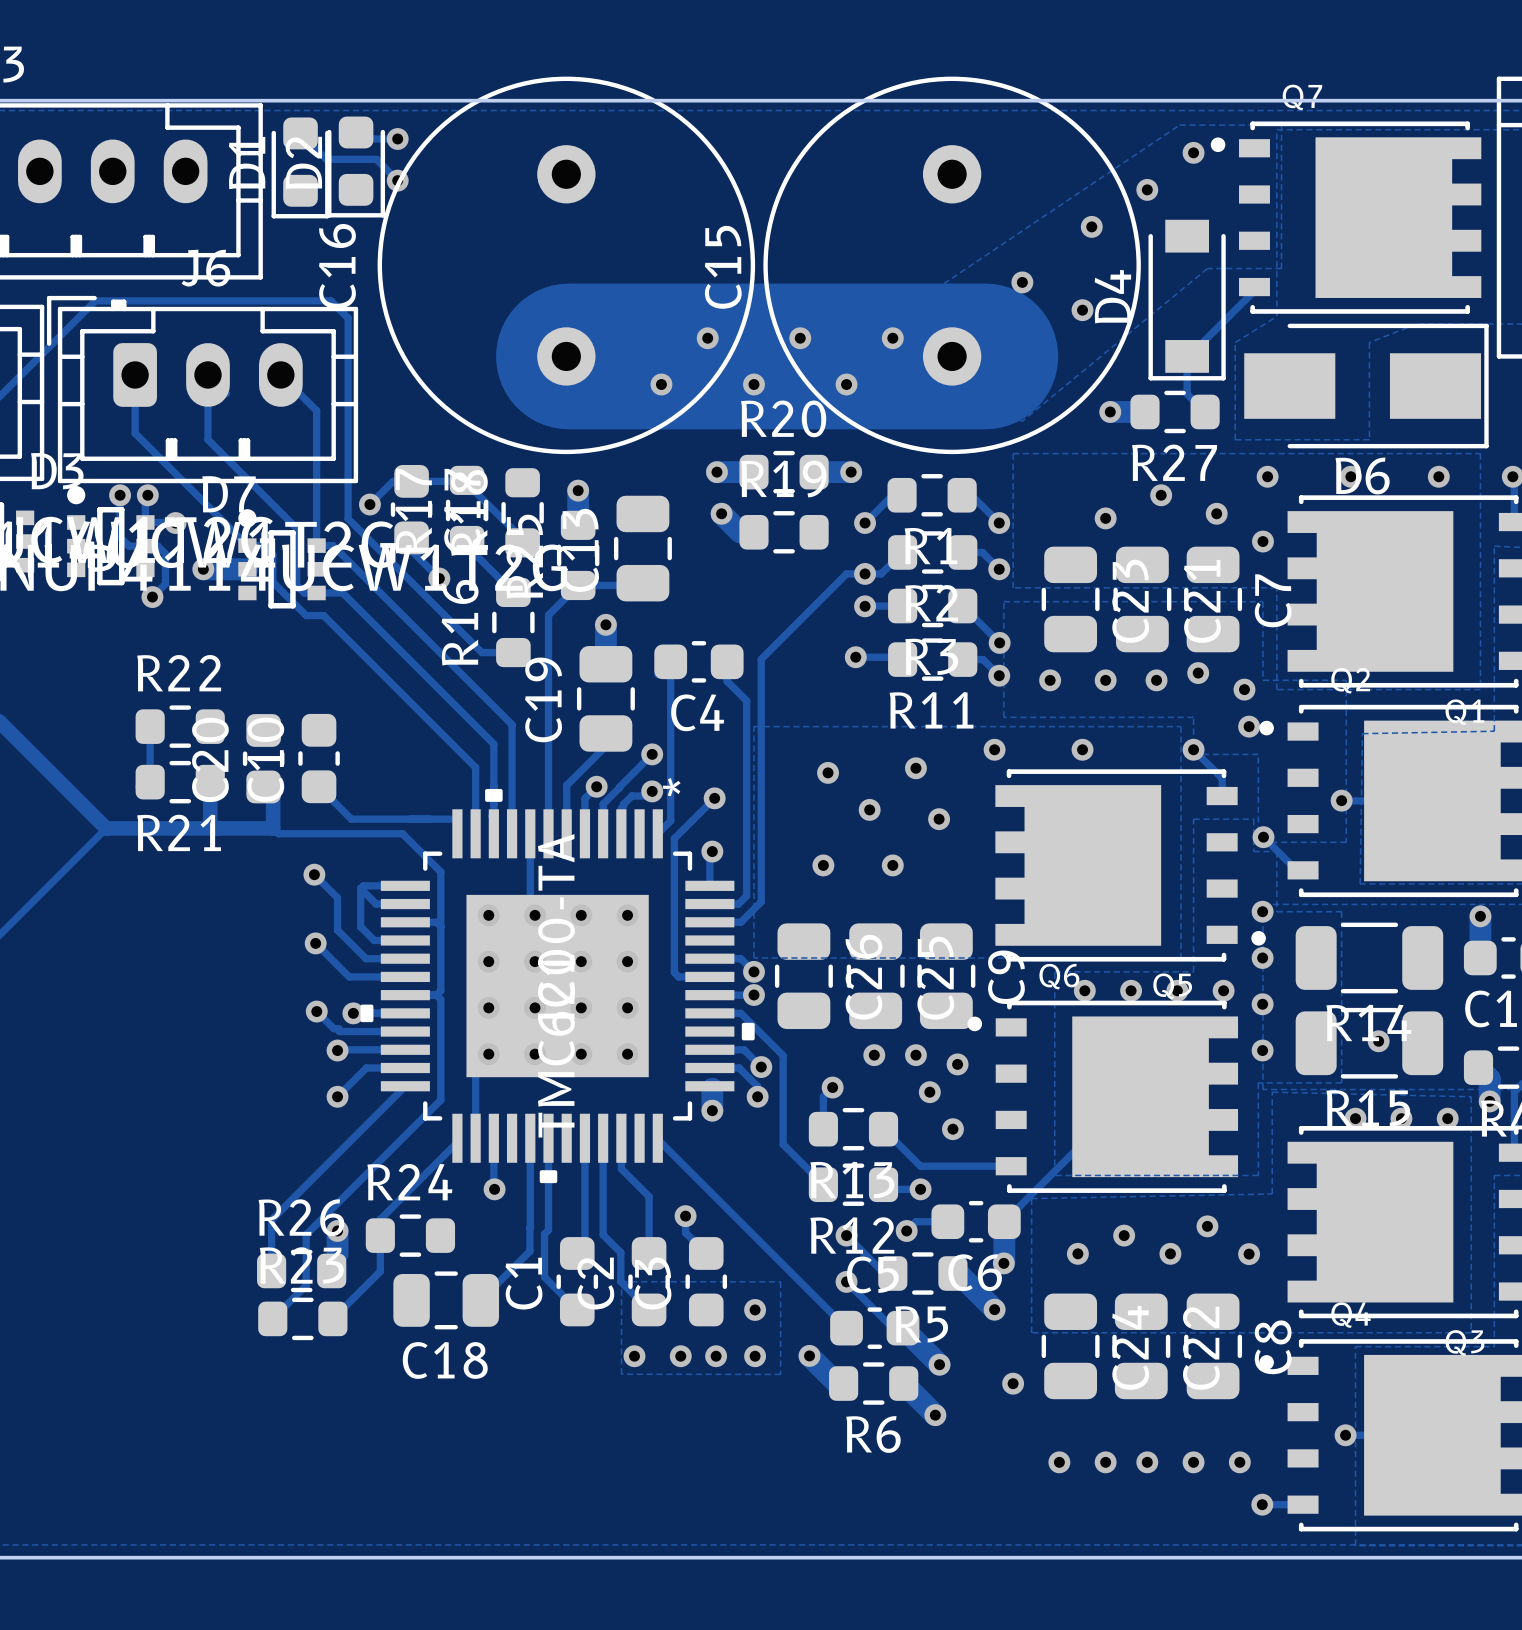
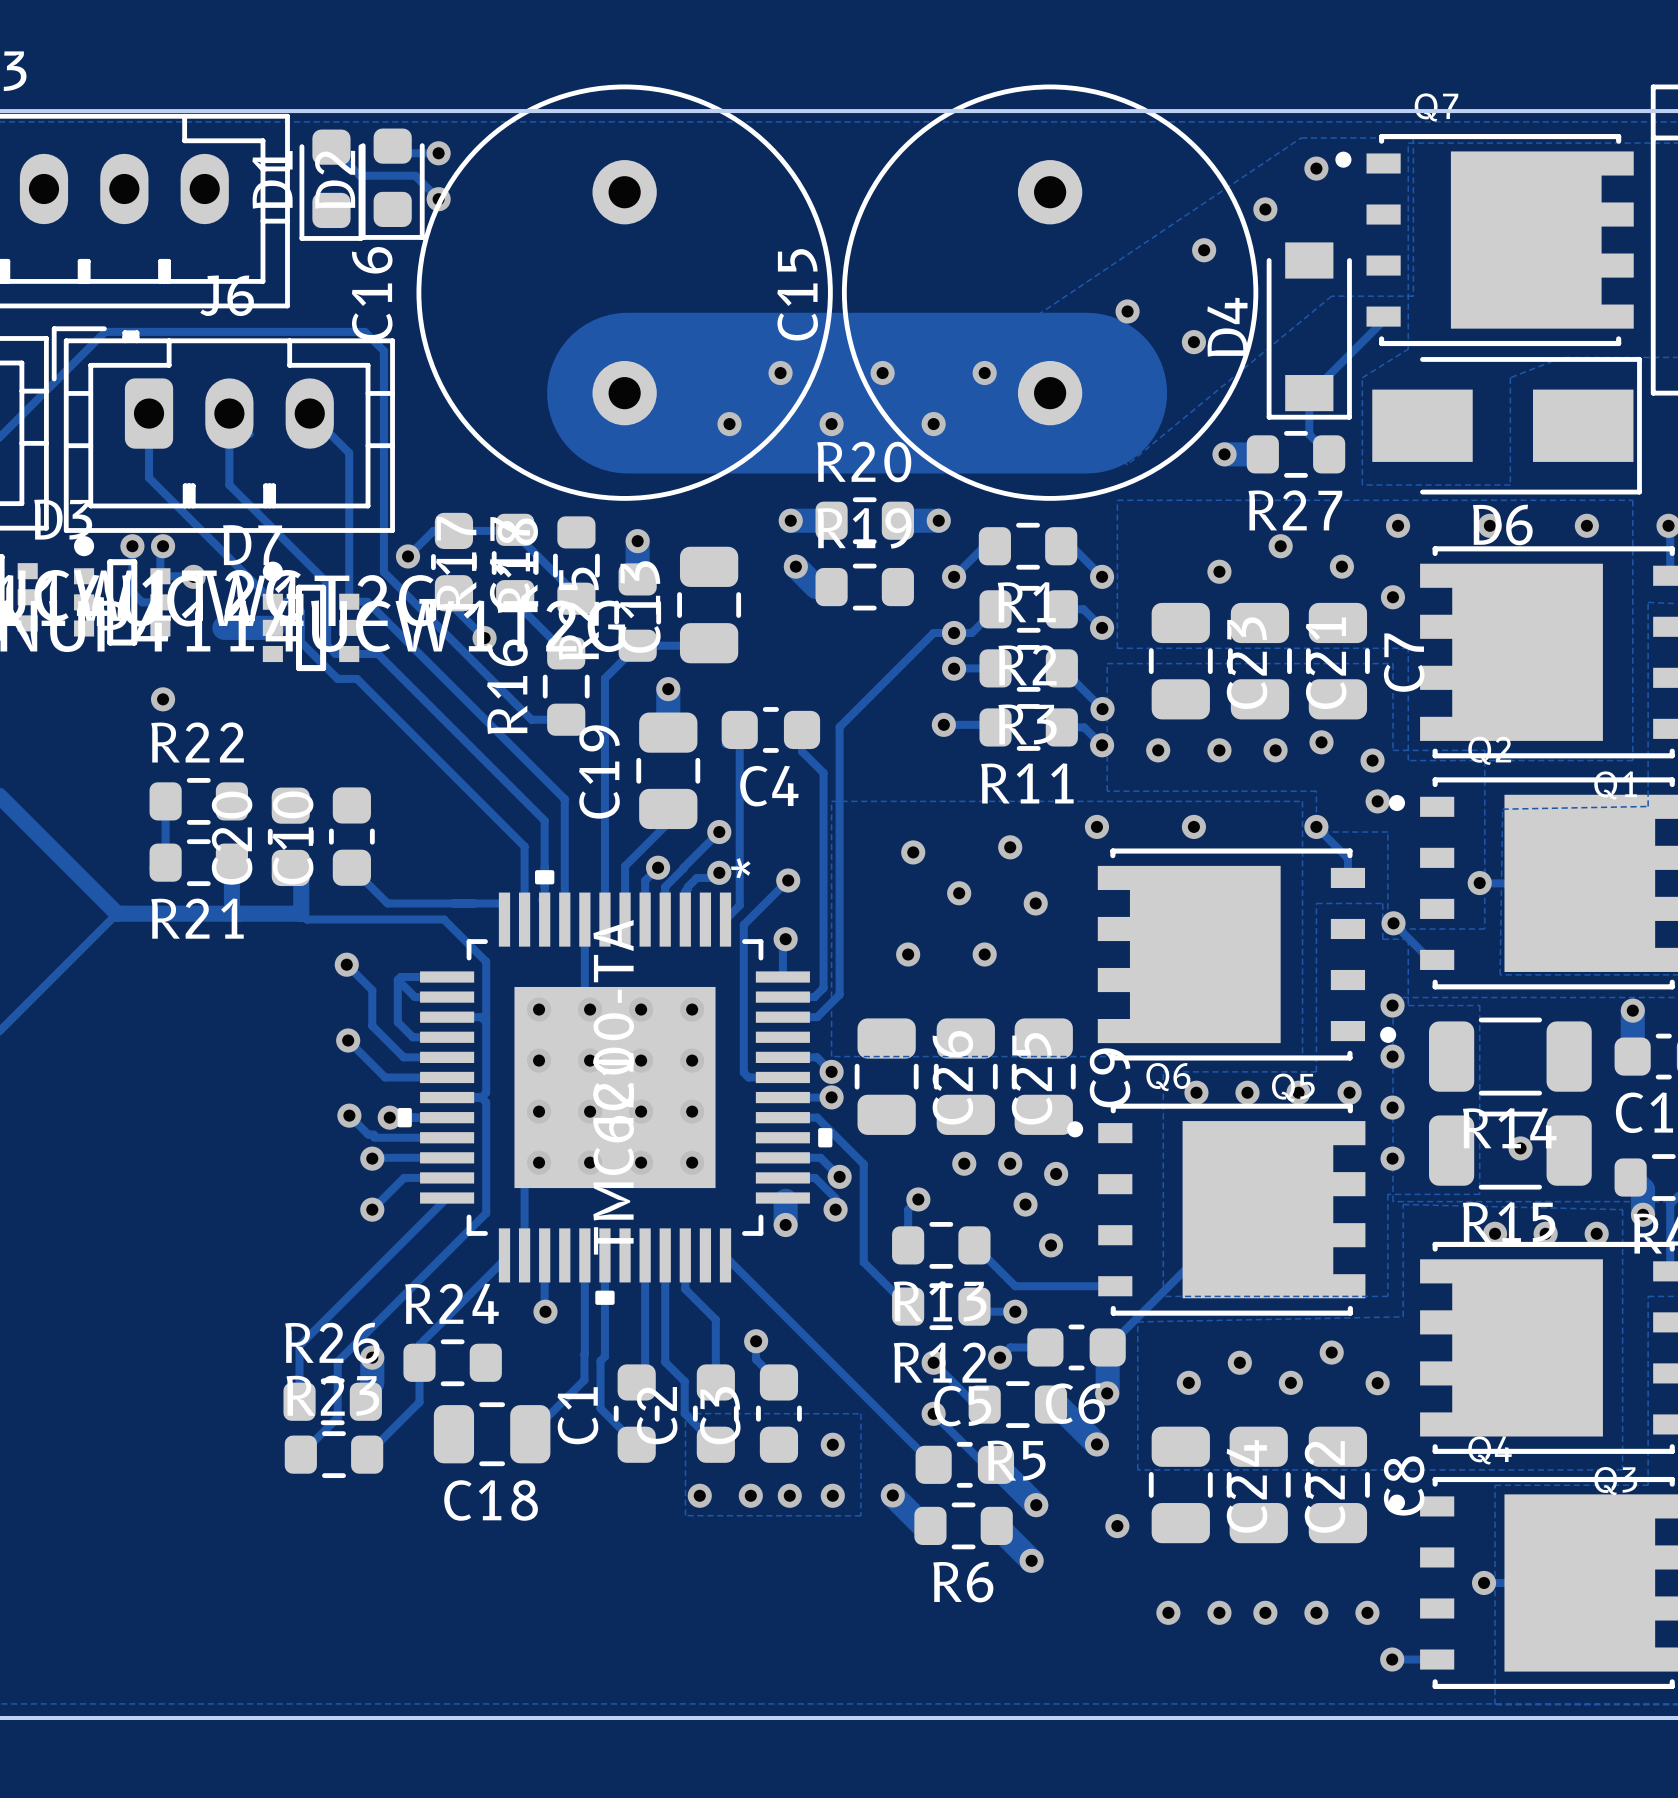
track: (145, 546) (157, 546) (165, 553) (165, 584) (152, 597) -> none
via: (203, 569) -> none
via position: (152, 597) -> (163, 699)

